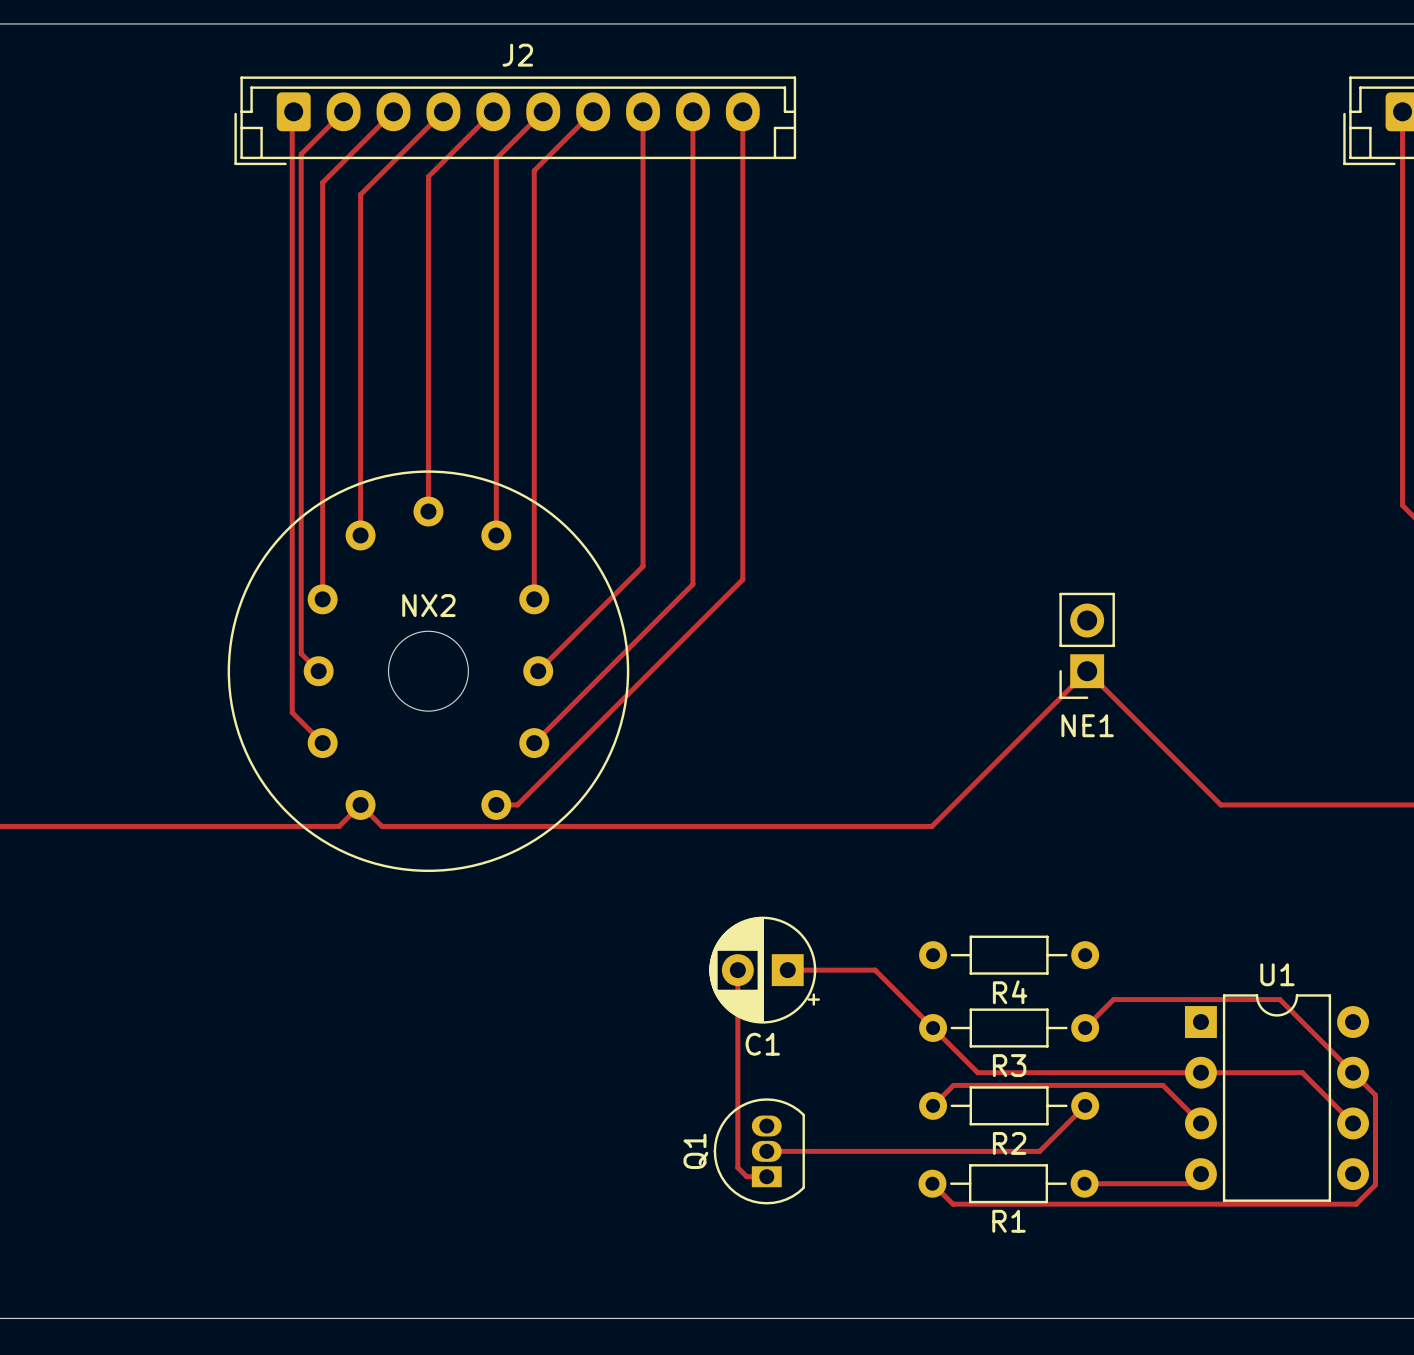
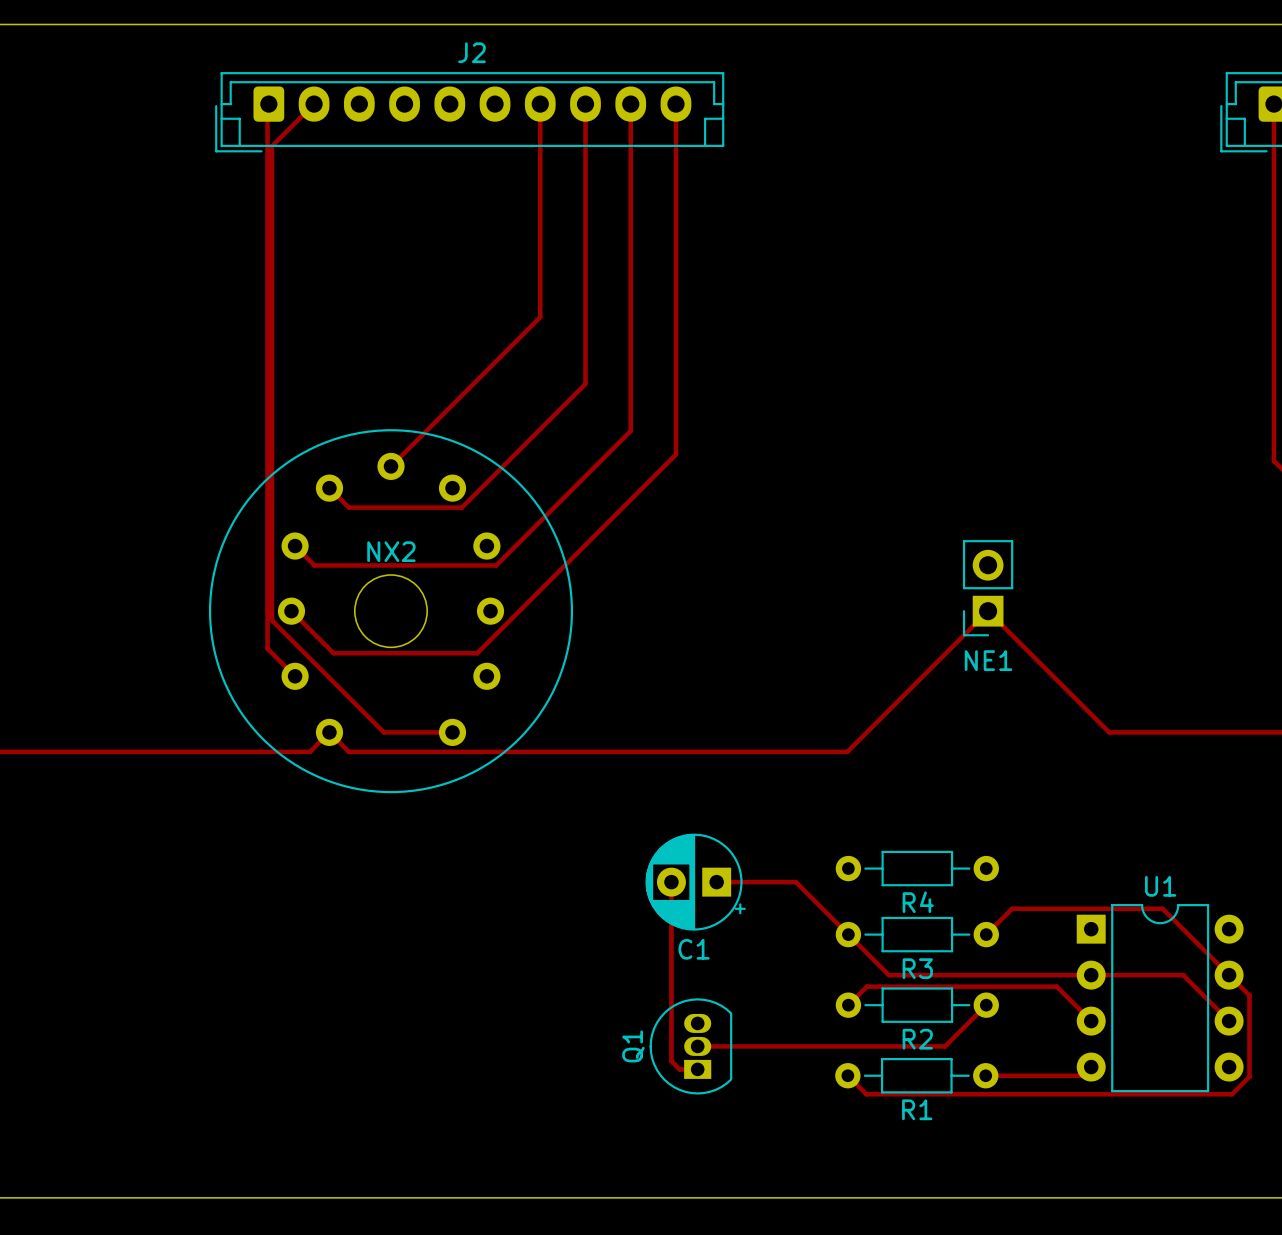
track: (393, 111) (322, 182) (322, 599) -> none
track: (443, 111) (360, 194) (360, 535) -> none
track: (493, 111) (428, 176) (428, 511) -> (540, 104) (540, 317) (391, 466)
track: (543, 111) (496, 158) (496, 535) -> none
track: (593, 111) (534, 170) (534, 599) -> none
track: (301, 154) (301, 653) (318, 671) -> (275, 142) (272, 146) (272, 620) (383, 732) (452, 732)
track: (643, 420) (643, 566) (538, 671) -> (585, 383) (461, 507) (348, 507) (329, 488)
track: (692, 472) (692, 584) (534, 743) -> (630, 430) (496, 565) (314, 565) (295, 546)
track: (742, 498) (742, 579) (517, 804) (496, 804) -> (675, 454) (477, 653) (333, 653) (291, 611)

